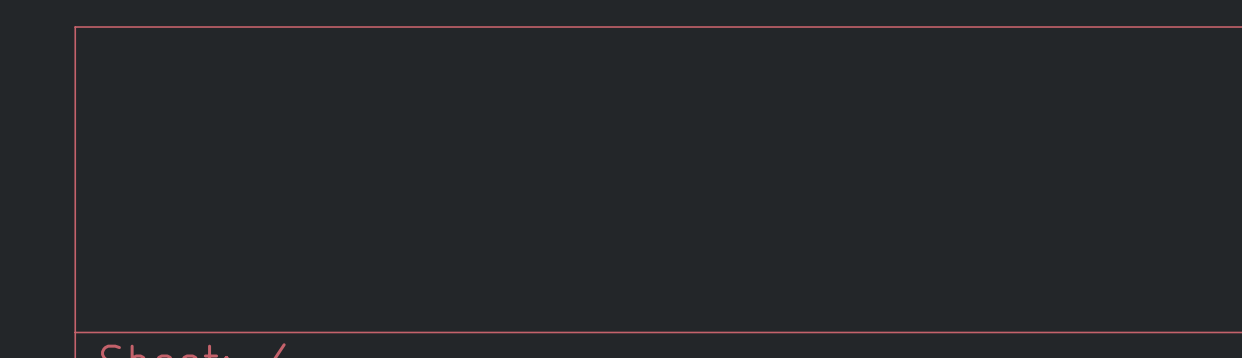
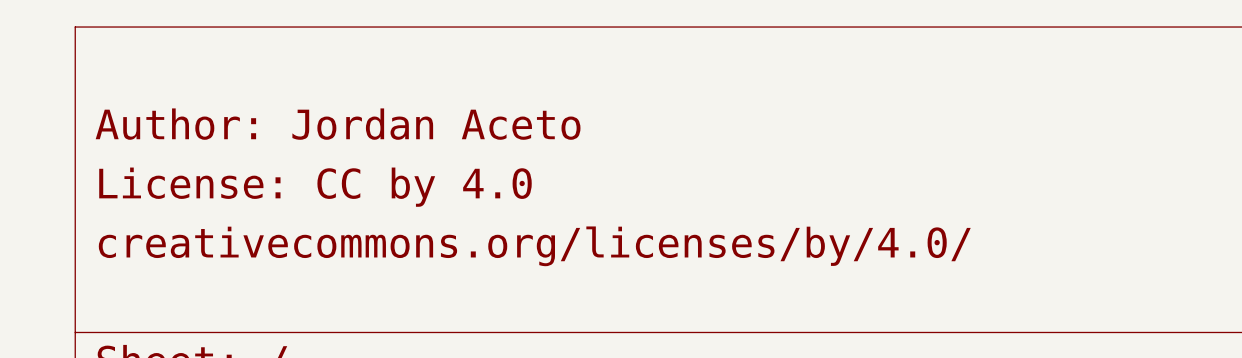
title block: none -> Author: Jordan Aceto (338, 124)
title block: none -> License: CC by 4.0 (315, 187)
title block: none -> creativecommons.org/licenses/by/4.0/ (534, 246)

